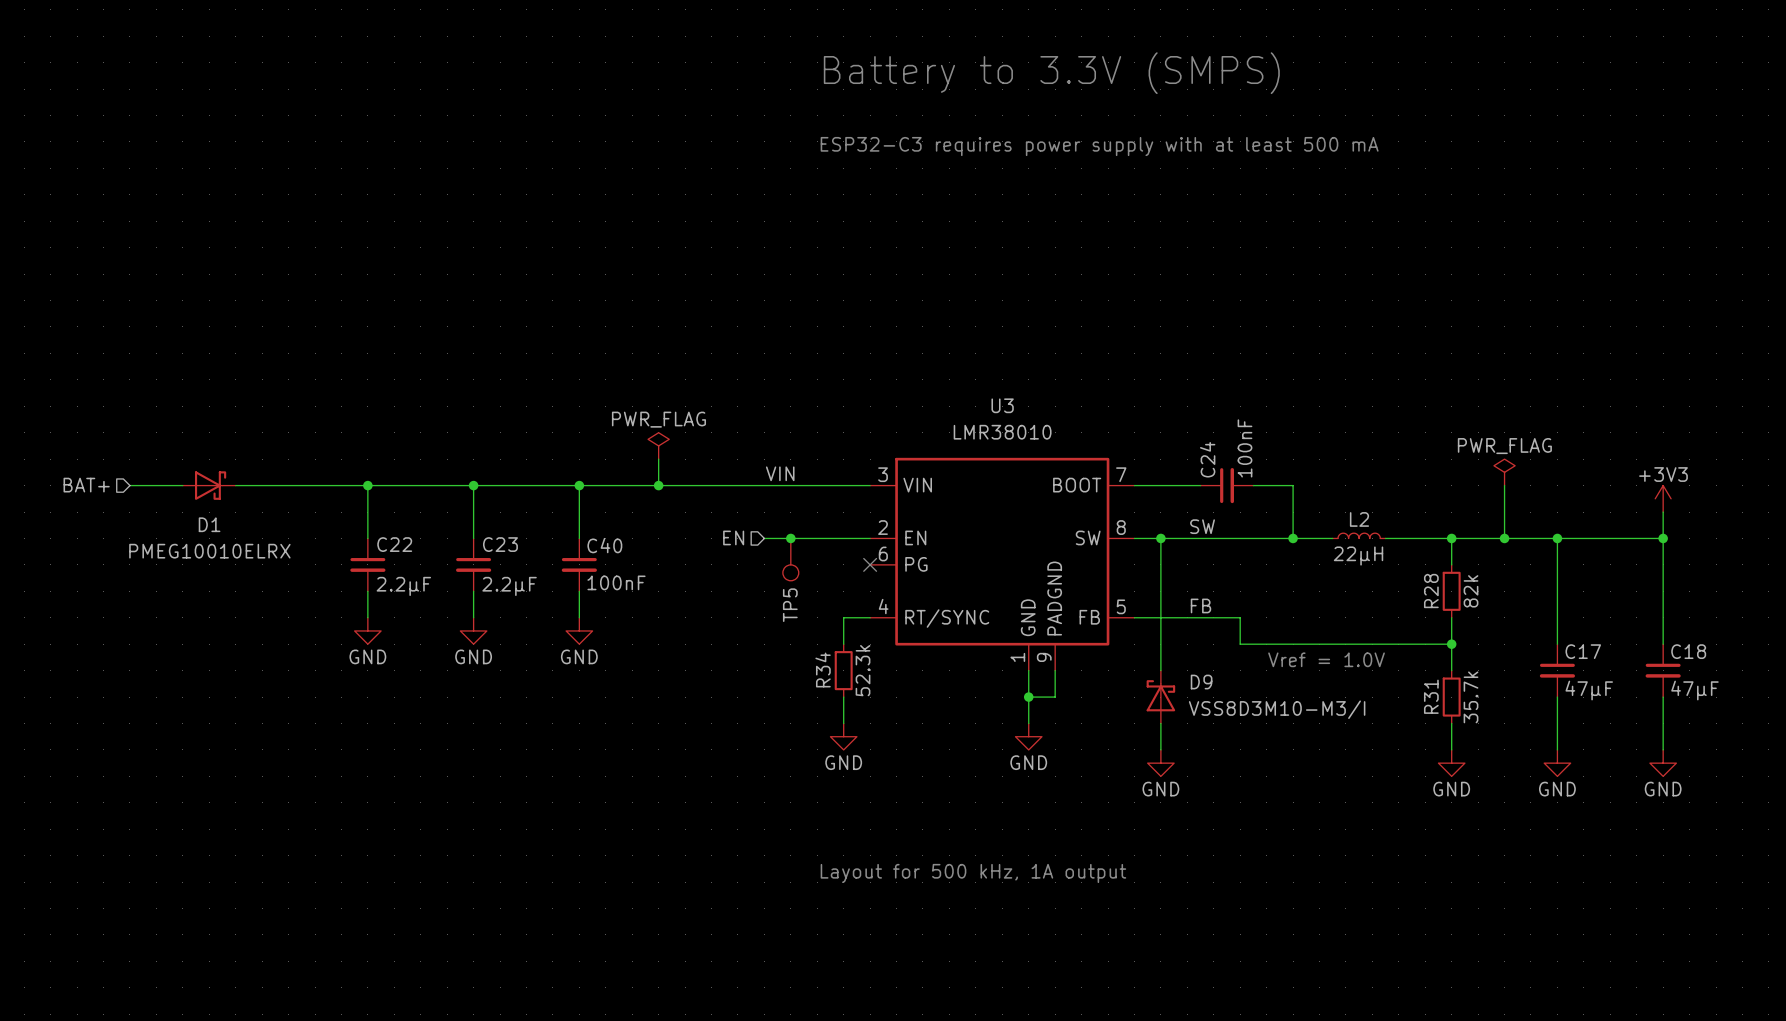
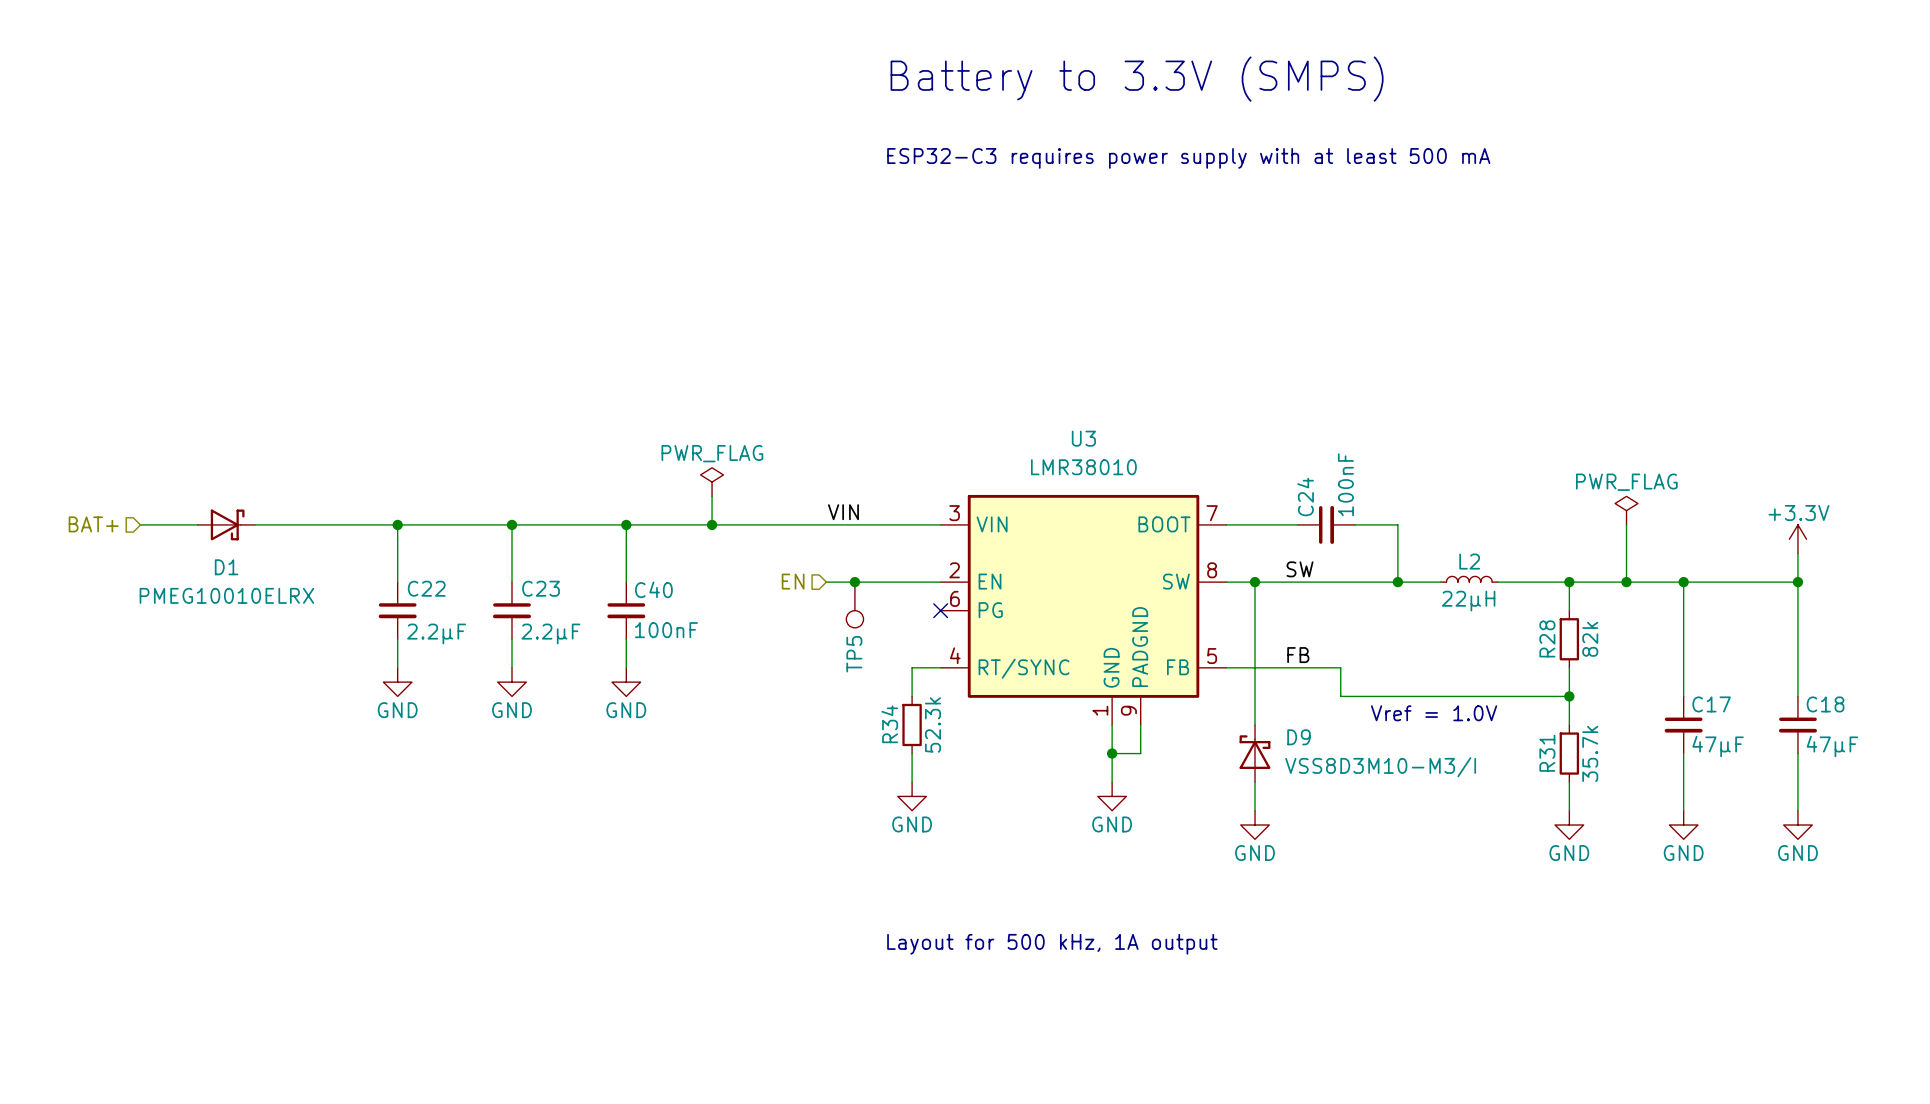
power symbol: +3V3 (1663, 498) -> +3.3V (1797, 539)

